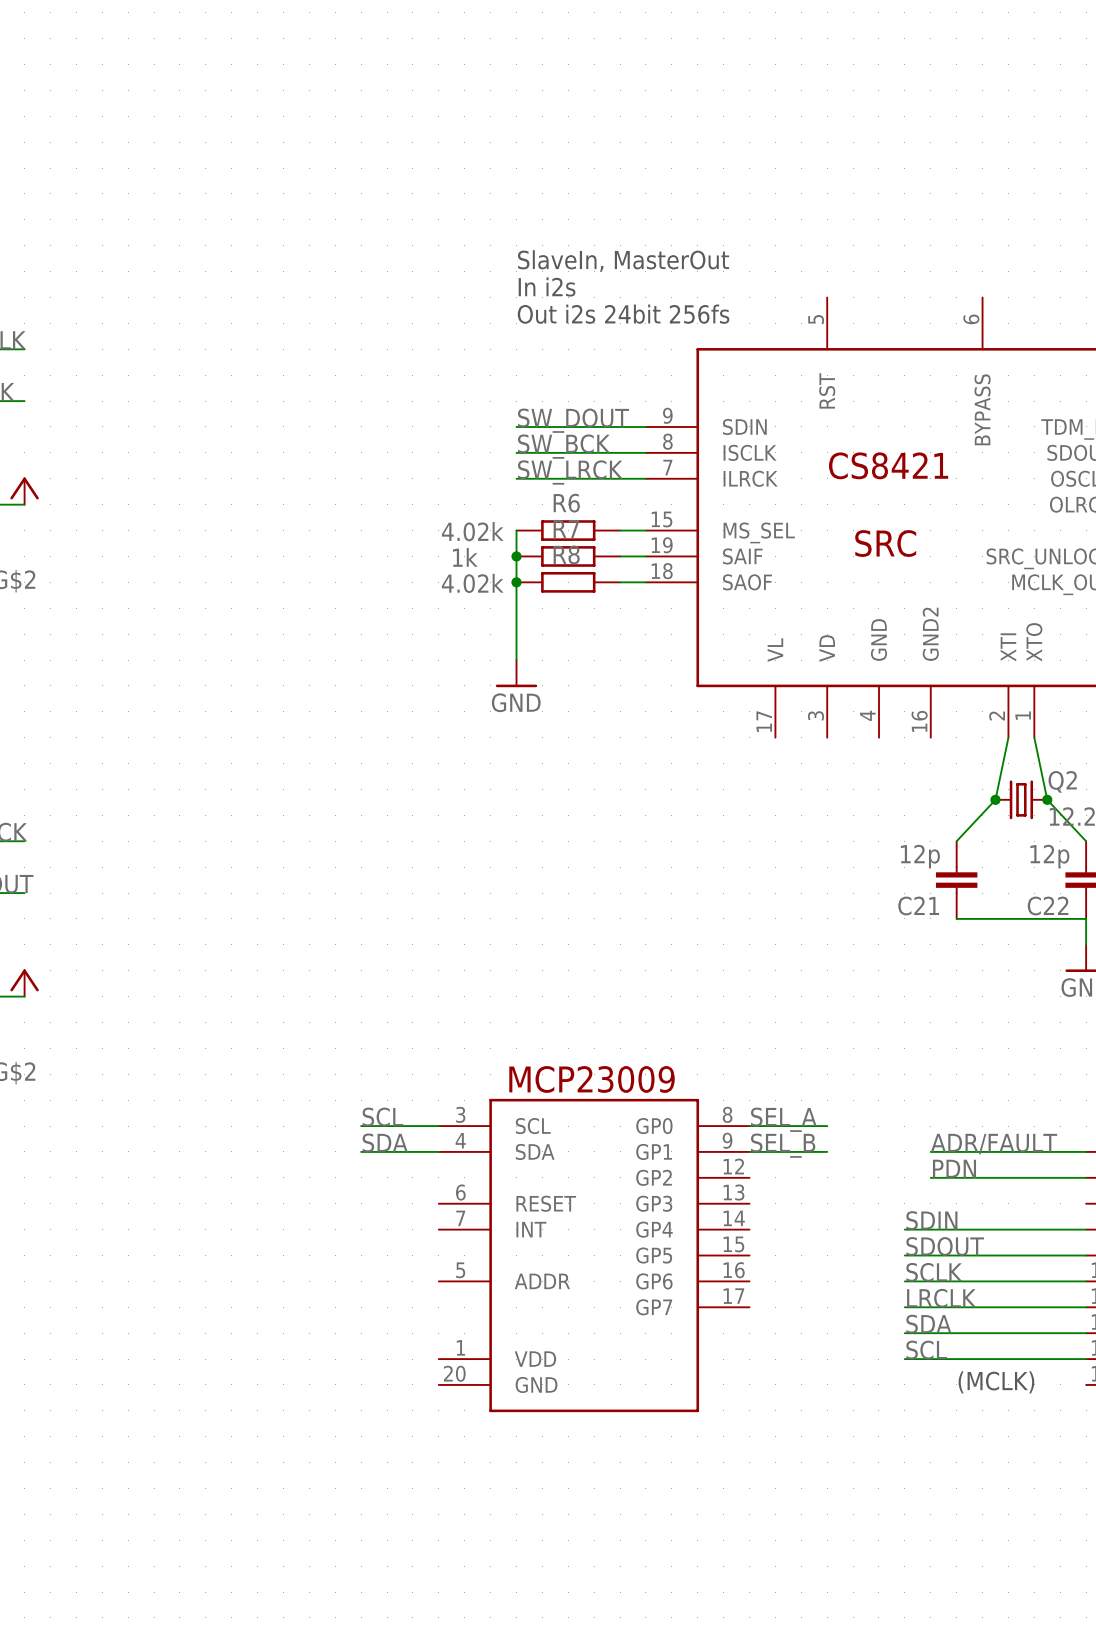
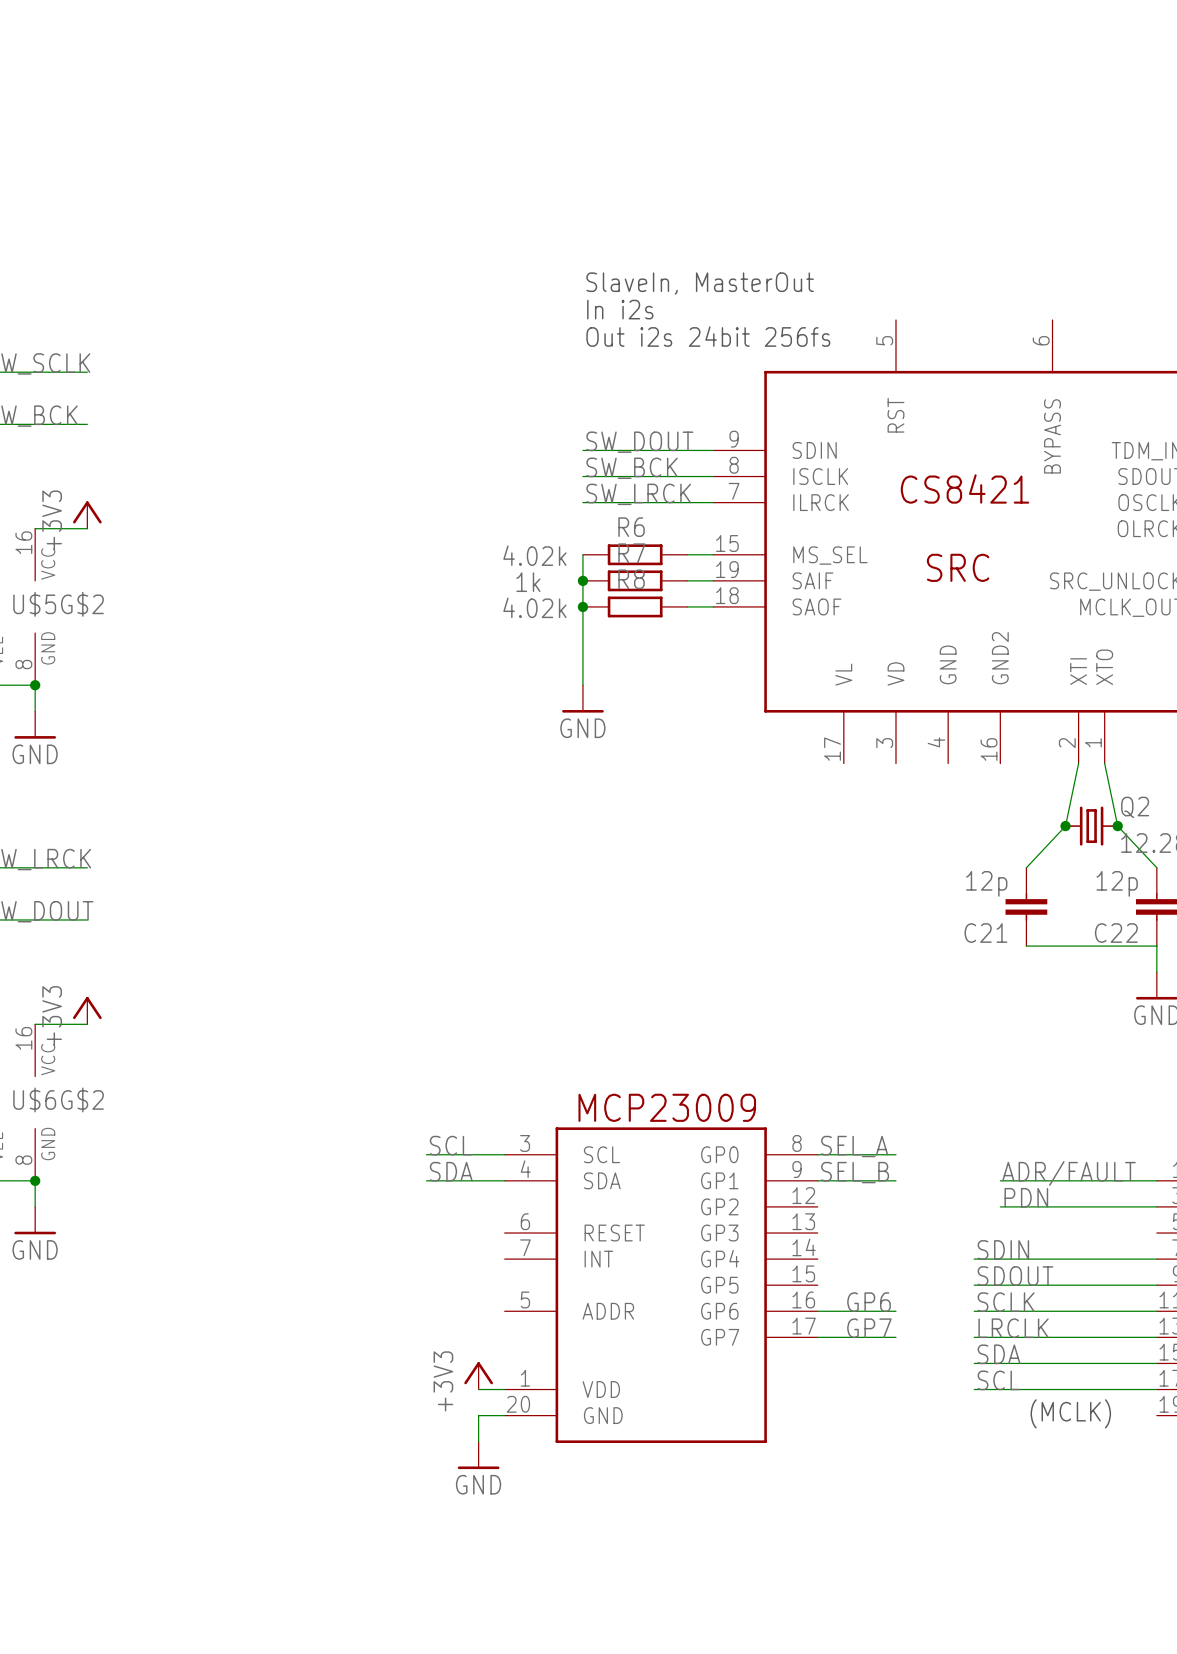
label: none -> GP6 (869, 1302)
wire: none -> (817, 1311) (895, 1311)
label: none -> GP7 (869, 1328)
wire: none -> (817, 1337) (895, 1337)
power symbol: none -> +3V3 (478, 1375)
wire: none -> (478, 1389) (504, 1389)
wire: none -> (504, 1415) (478, 1415) (478, 1441)
power symbol: none -> GND (478, 1455)

